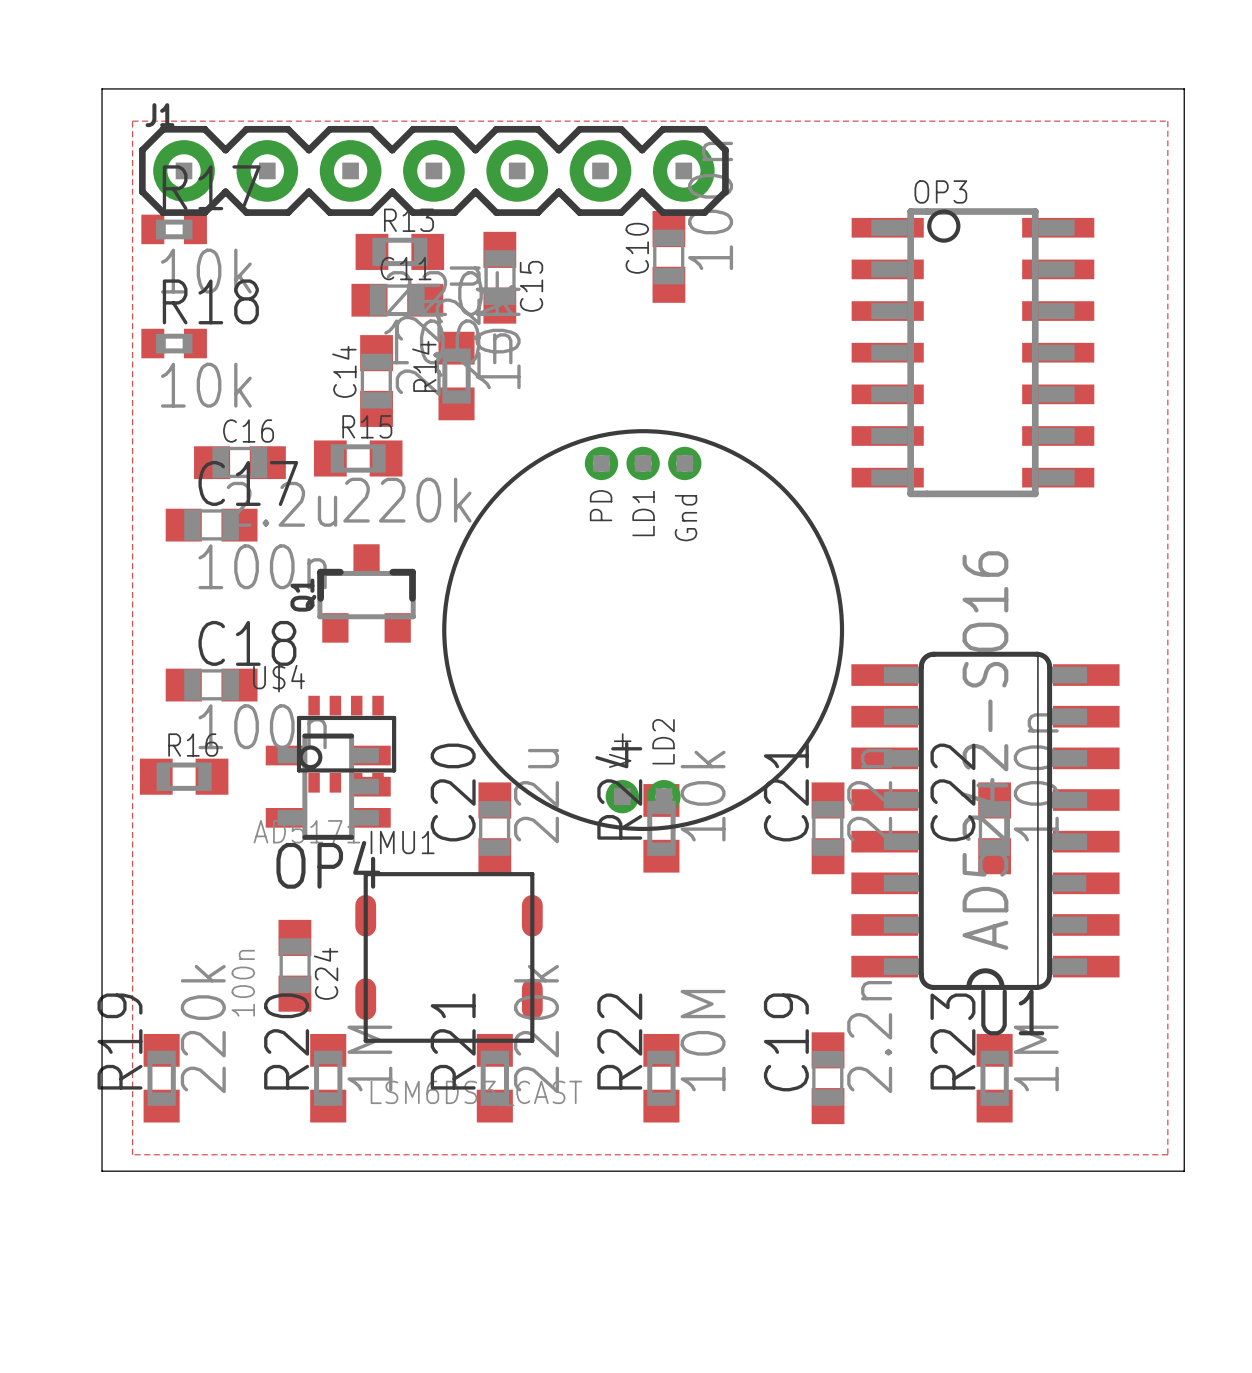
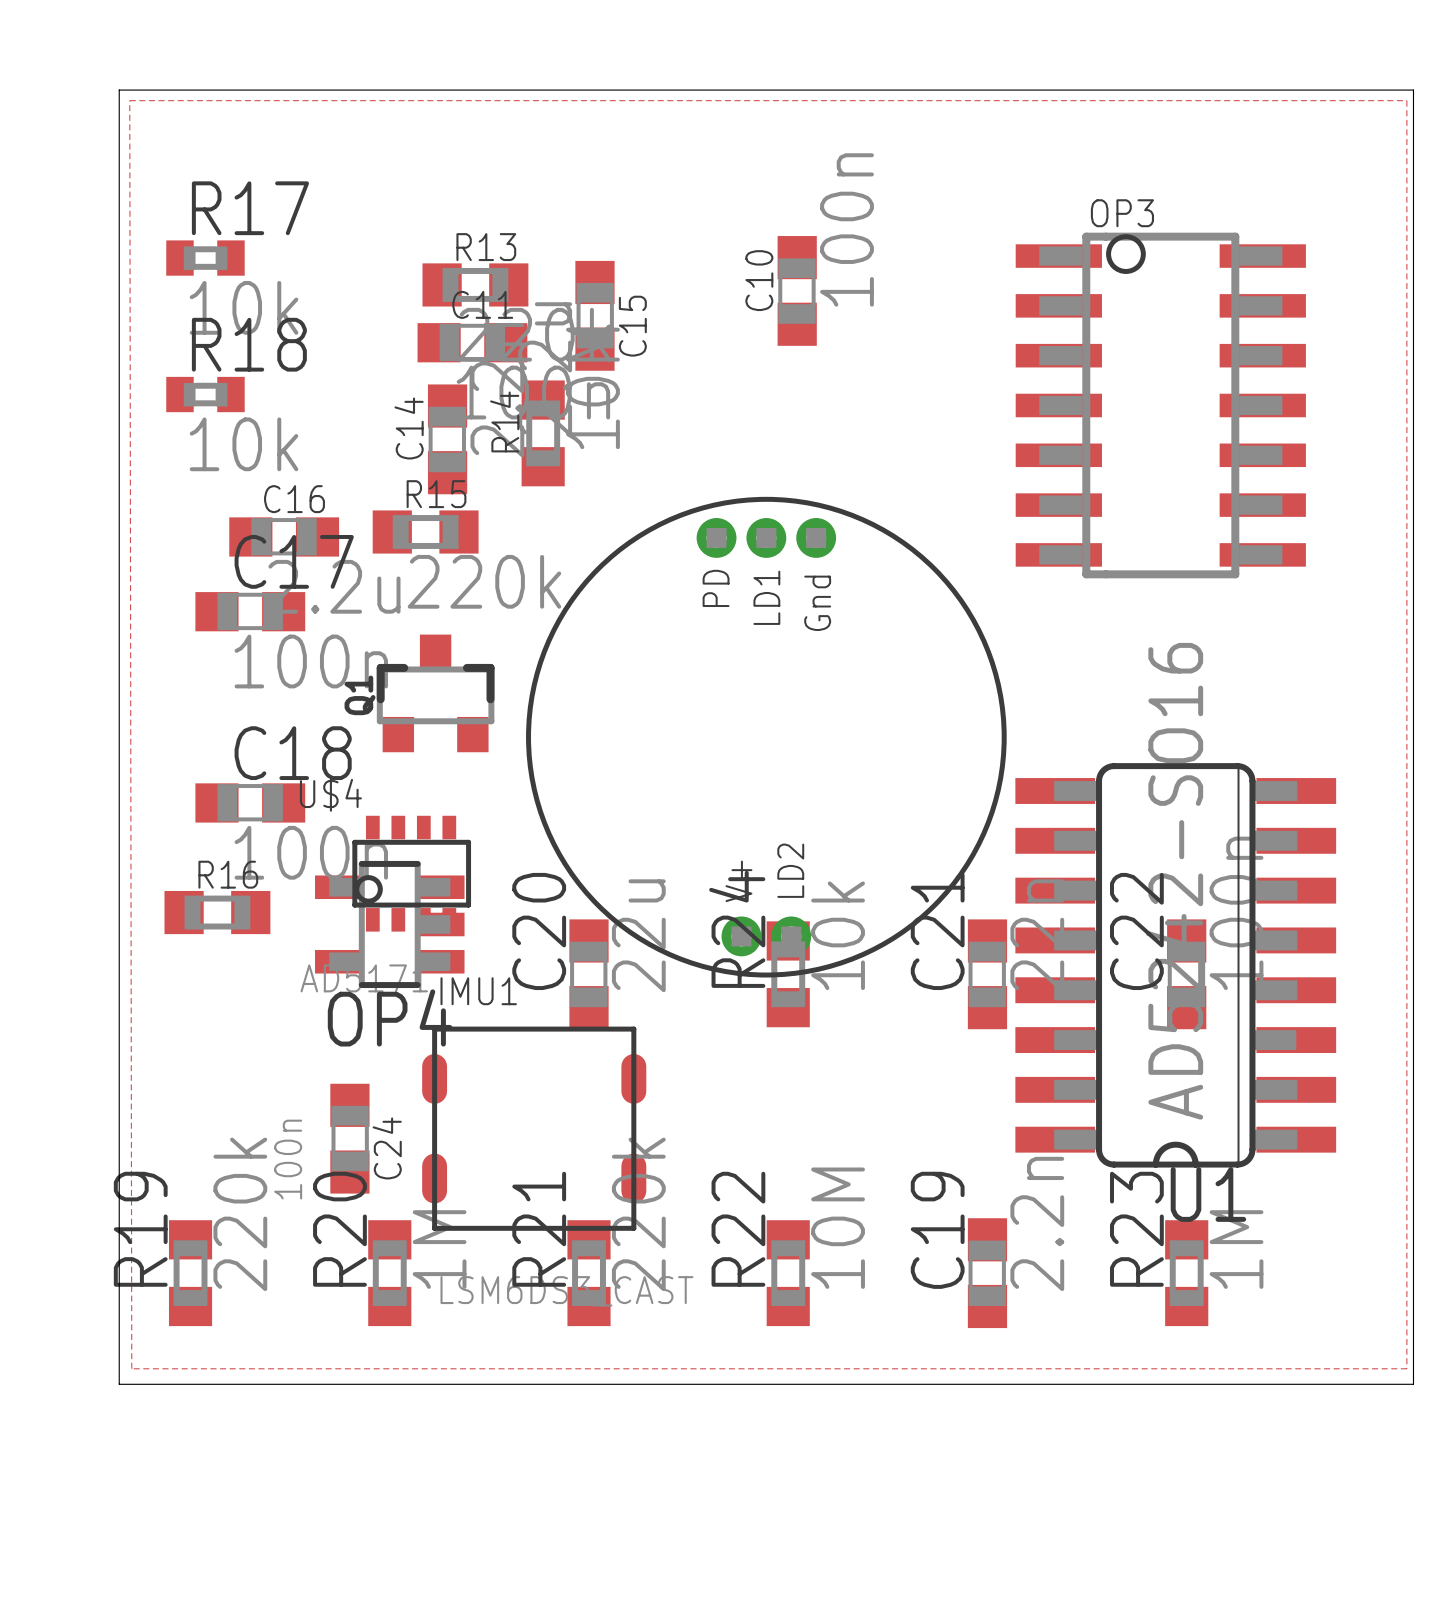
zone outline: (132, 121) (1167, 121) (1167, 1154) (132, 1154) (132, 121) -> (129, 100) (131, 1368) (1406, 1368) (1406, 100) (129, 100)
J1: (433, 170) -> none

